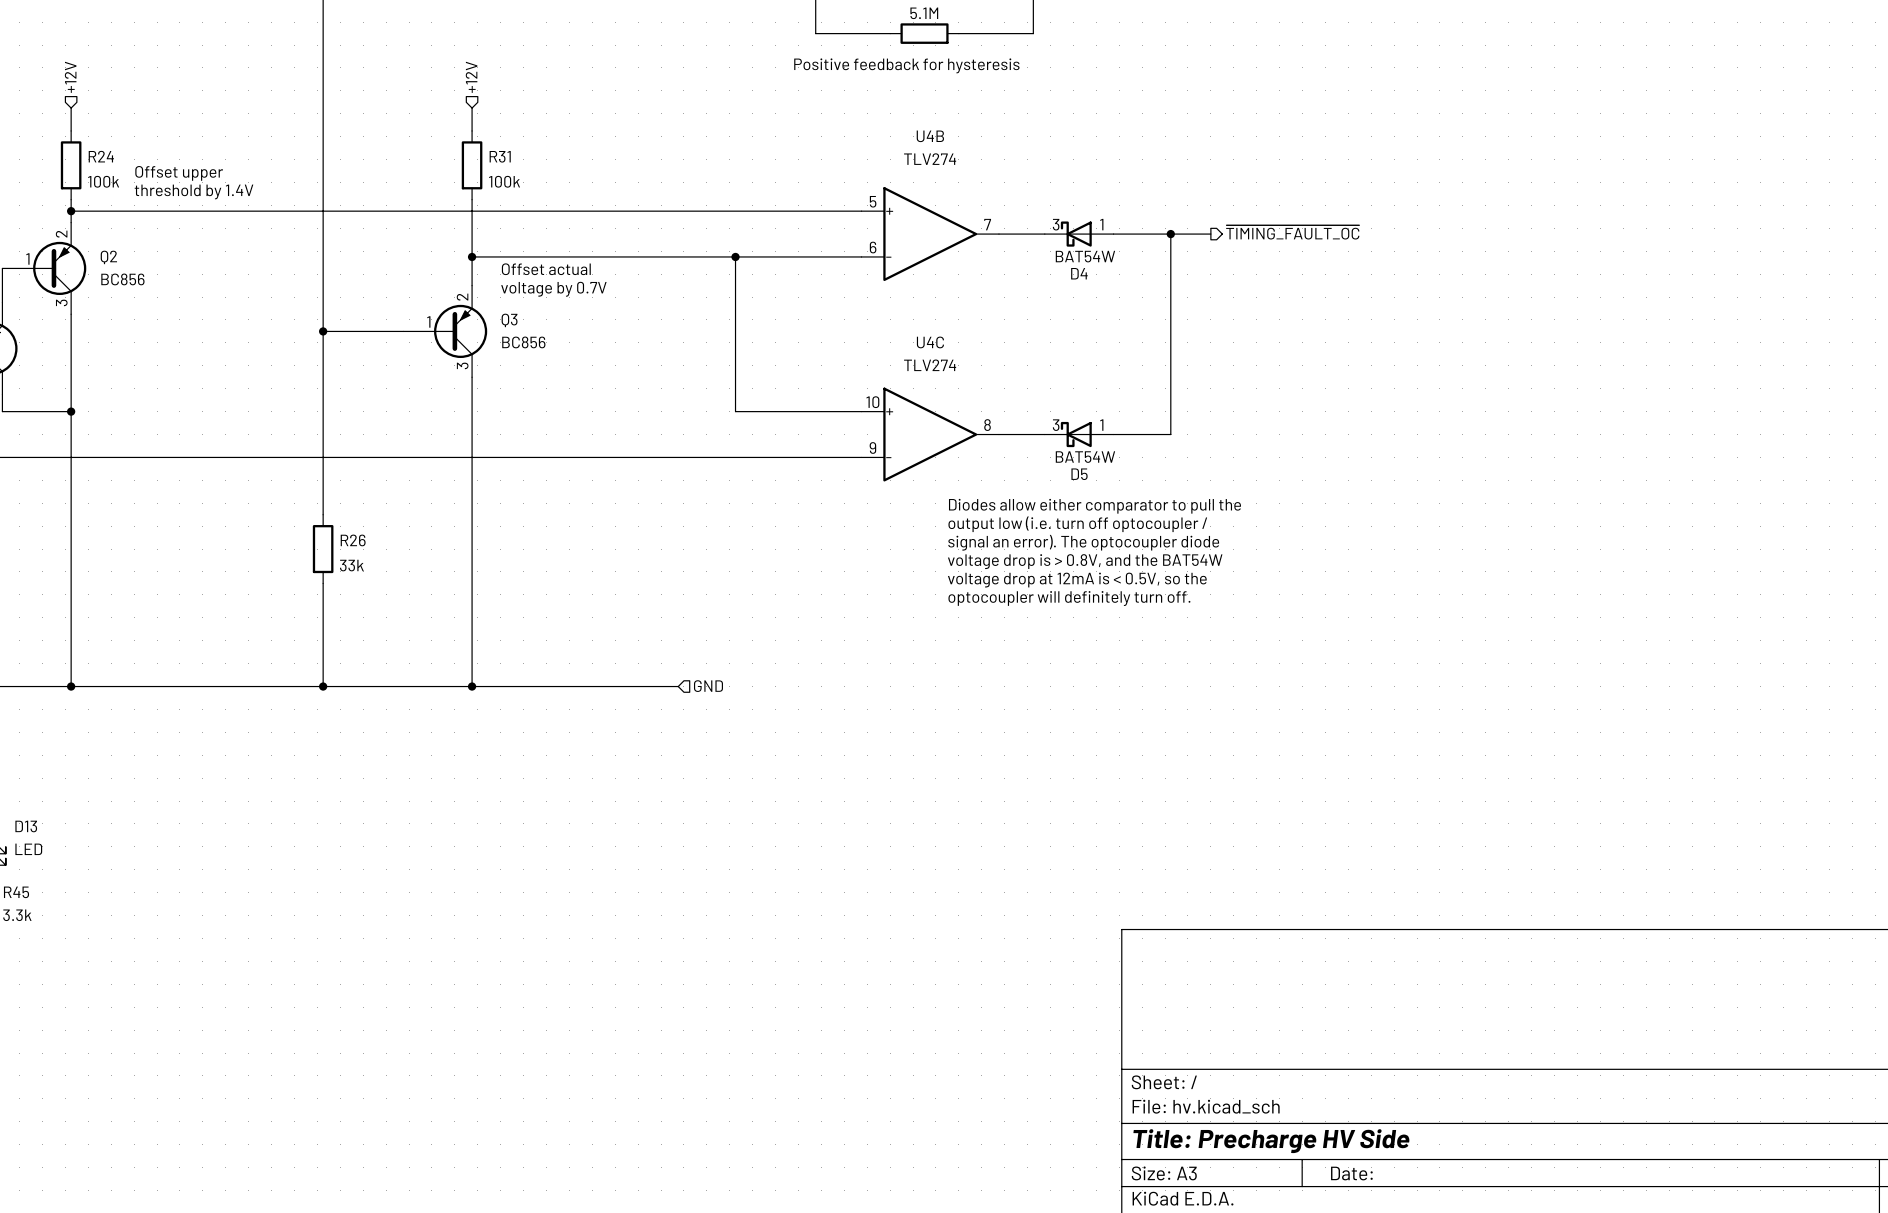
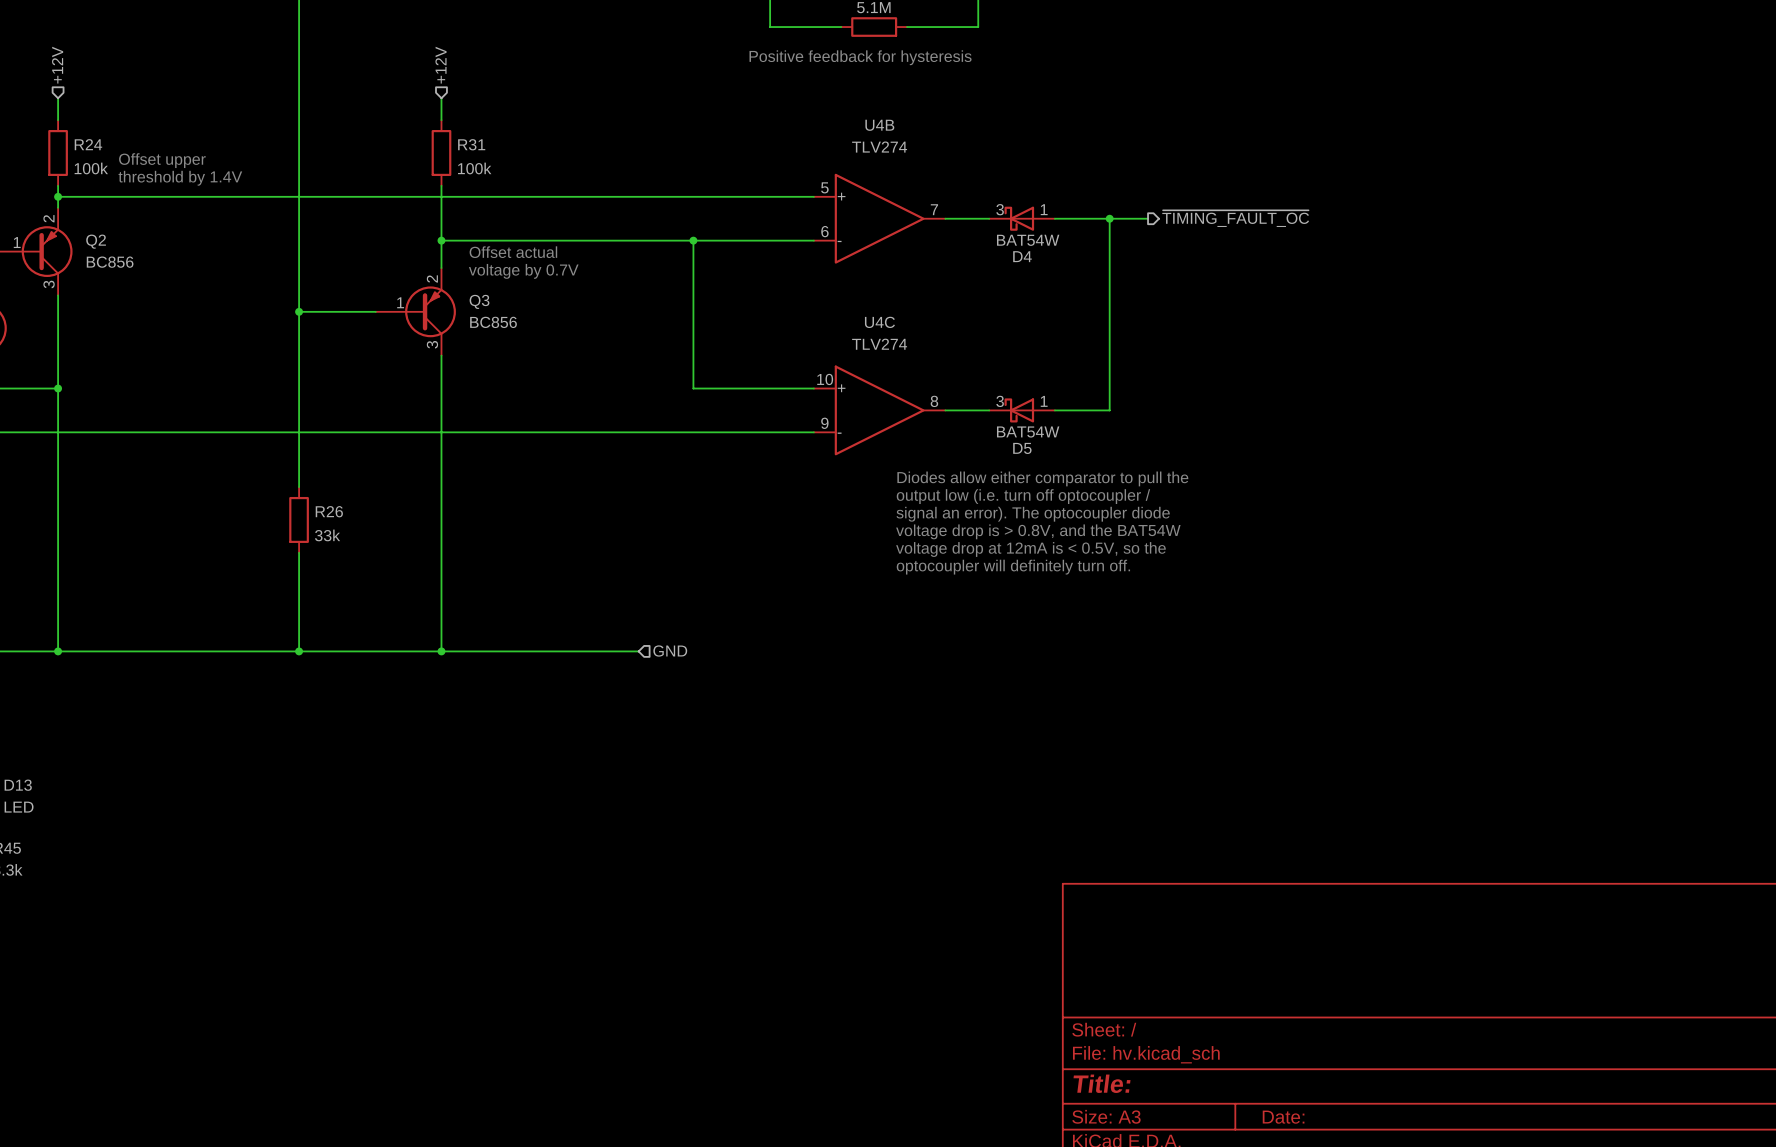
title block: Title: Precharge HV Side (1271, 1141) -> Title: (1102, 1083)

